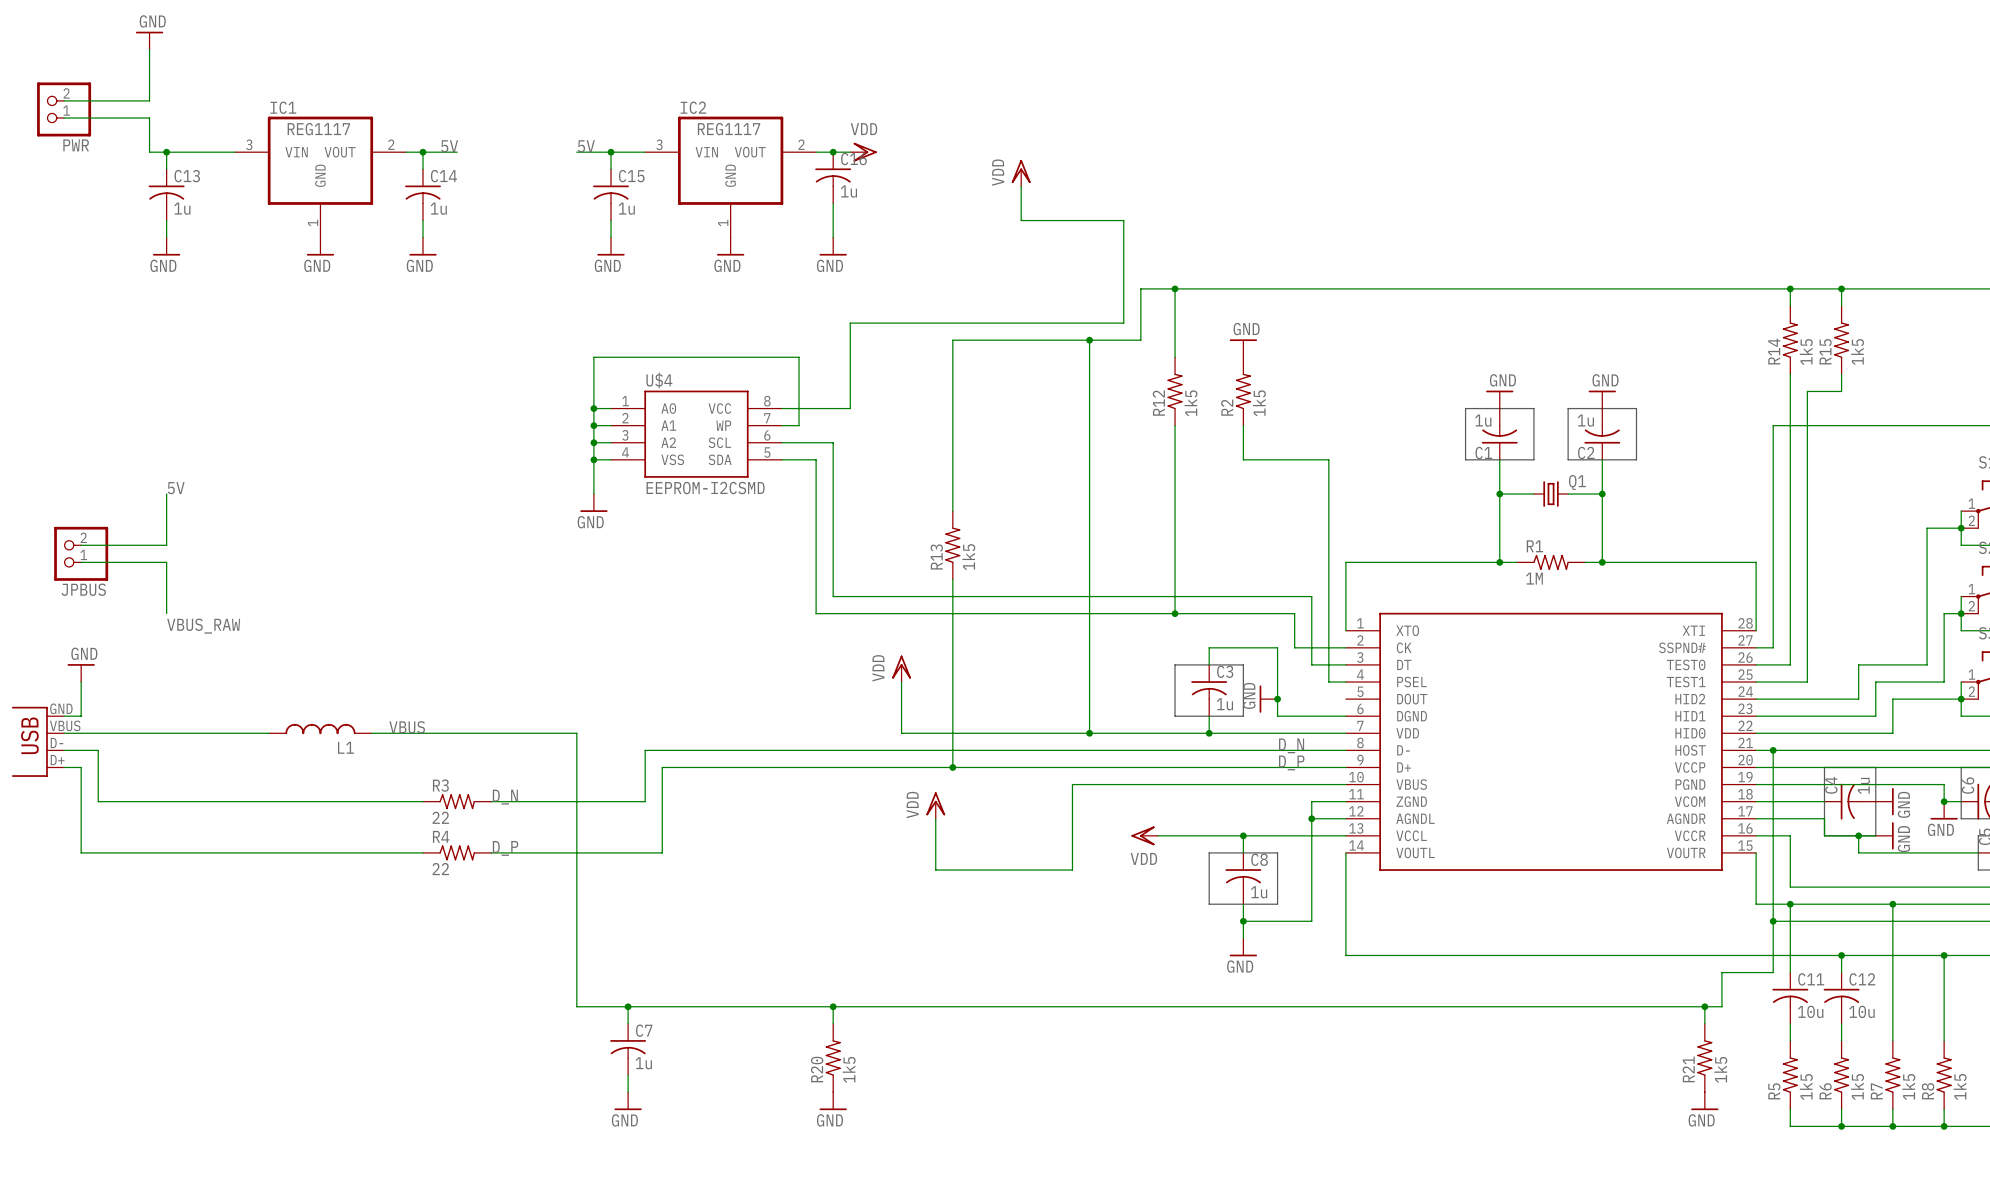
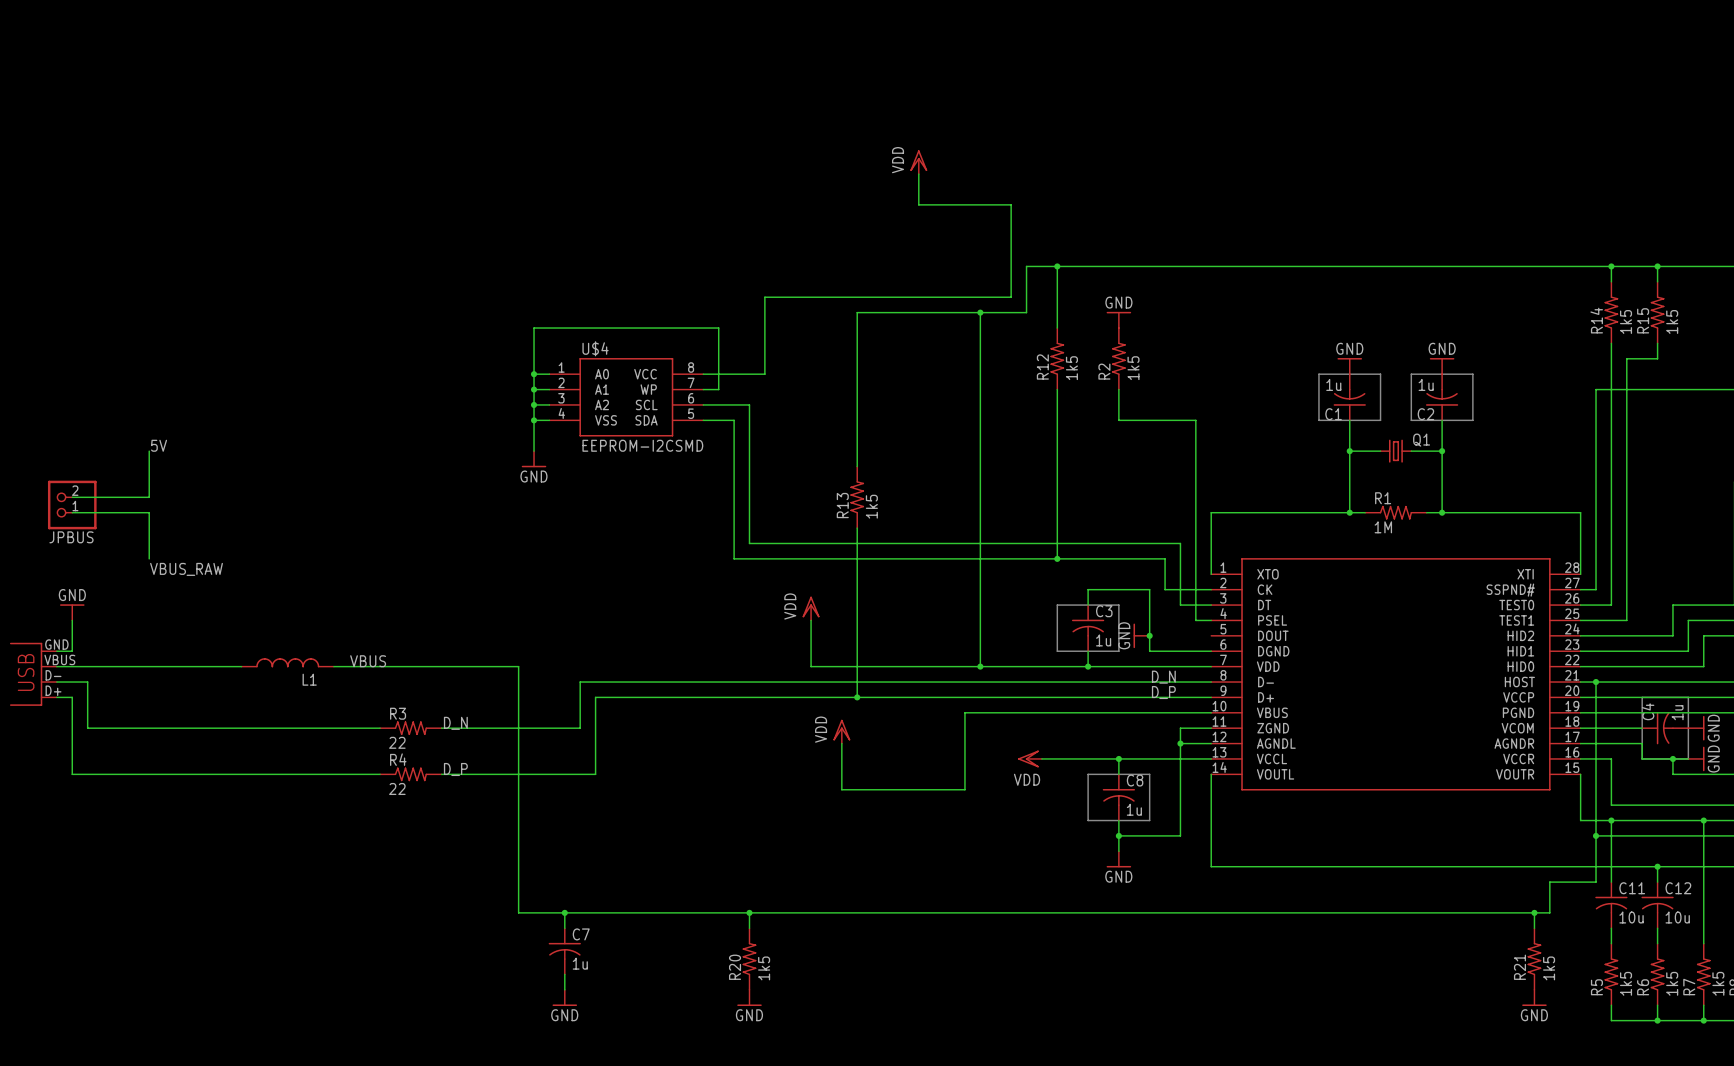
power symbol: GND (149, 40) -> none
wire: (149, 49) (149, 100) (64, 100) -> none
PWR: (64, 109) -> none
wire: (64, 118) (149, 118) (149, 152) (234, 152) -> none
label: 5V (449, 146) -> none
label: 5V (586, 146) -> none
wire: (166, 152) (166, 169) -> none
junction: (166, 152) -> none
wire: (405, 152) (457, 152) -> none
wire: (423, 152) (423, 169) -> none
junction: (423, 152) -> none
wire: (576, 152) (645, 152) -> none
wire: (611, 152) (611, 169) -> none
junction: (611, 152) -> none
wire: (816, 152) (850, 152) -> none
junction: (833, 152) -> none
power symbol: VDD (863, 152) -> none
IC1: REG1117 (320, 177) -> none
IC2: REG1117 (730, 177) -> none
C16: 1u (833, 177) -> none
C13: 1u (166, 194) -> none
C14: 1u (423, 194) -> none
C15: 1u (611, 194) -> none
wire: (833, 203) (833, 237) -> none
wire: (166, 220) (166, 237) -> none
wire: (423, 220) (423, 237) -> none
wire: (611, 220) (611, 237) -> none
power symbol: GND (166, 246) -> none
power symbol: GND (320, 246) -> none
power symbol: GND (423, 246) -> none
power symbol: GND (611, 246) -> none
power symbol: GND (730, 246) -> none
power symbol: GND (833, 246) -> none

